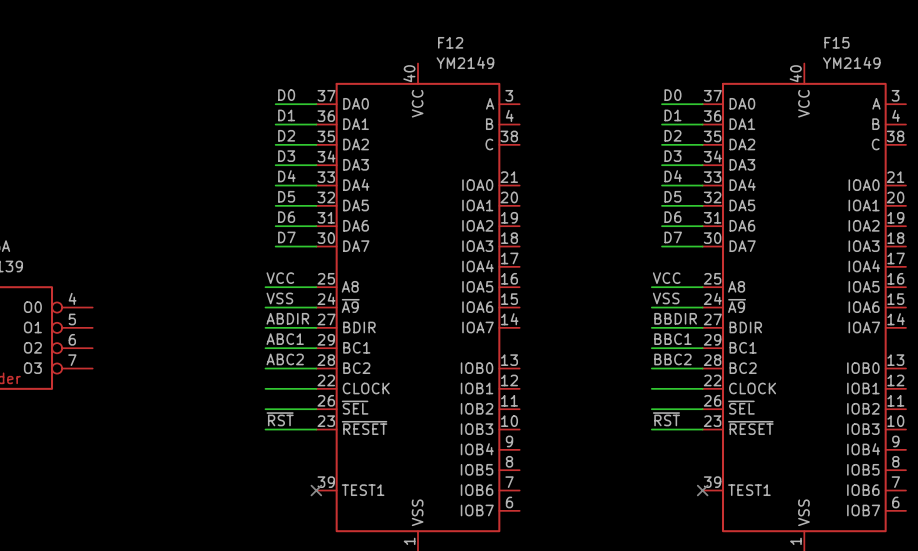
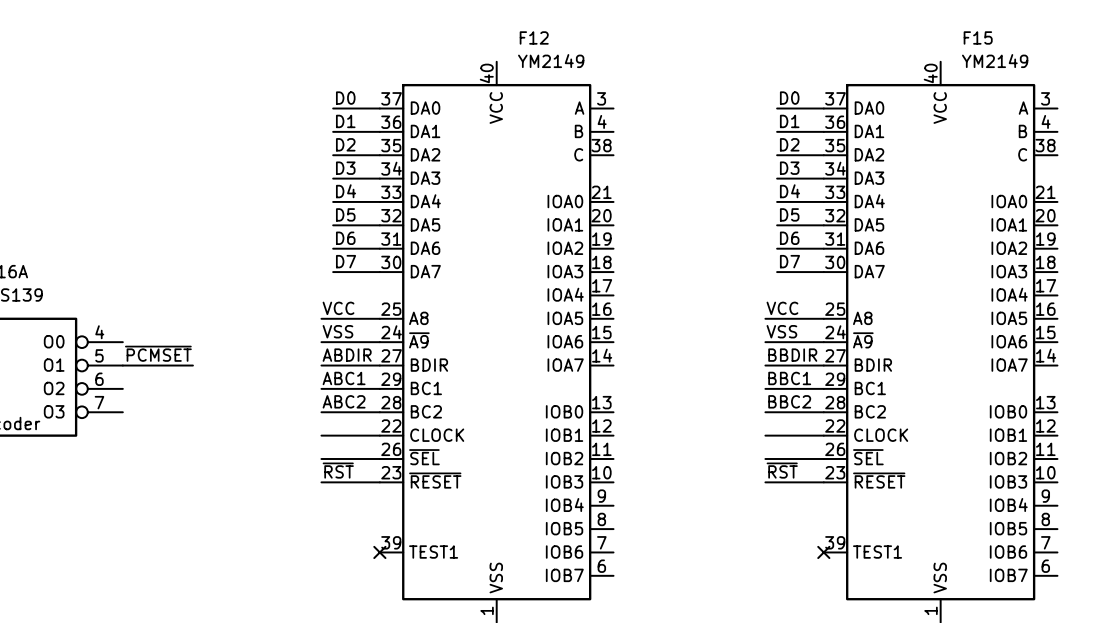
label: none -> ~{PCMSET} (158, 353)
wire: none -> (122, 365) (192, 365)

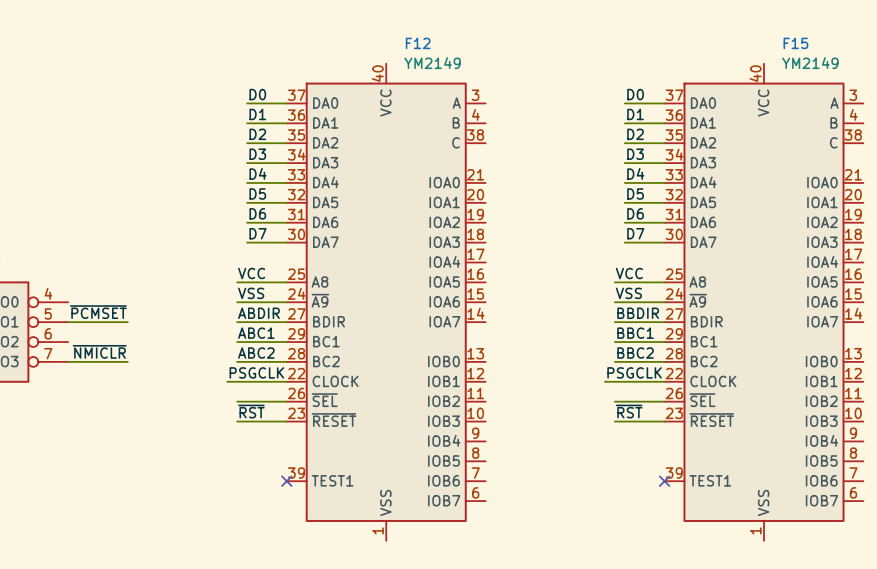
label: none -> ~{NMICLR} (99, 351)
wire: none -> (68, 361) (127, 361)
label: none -> PSGCLK (256, 372)
label: none -> PSGCLK (634, 372)
wire: none -> (227, 381) (237, 381)
wire: none -> (604, 381) (614, 381)

